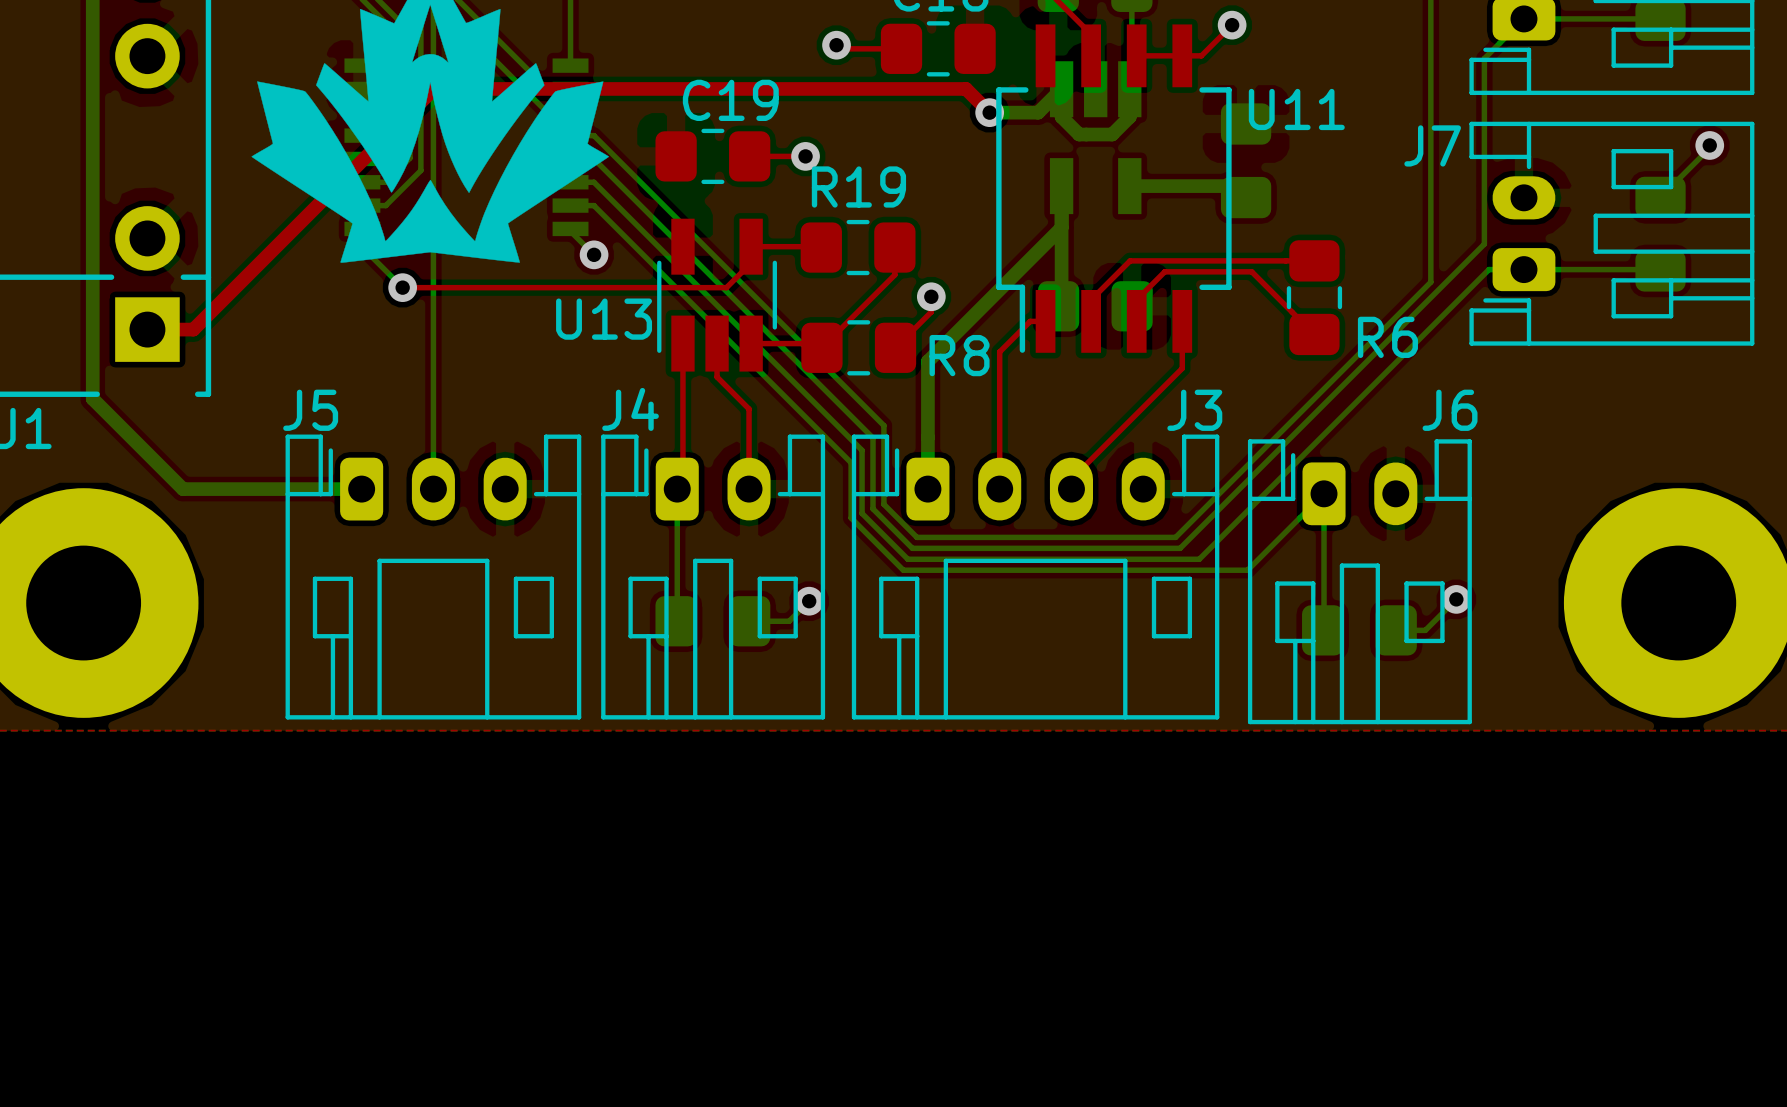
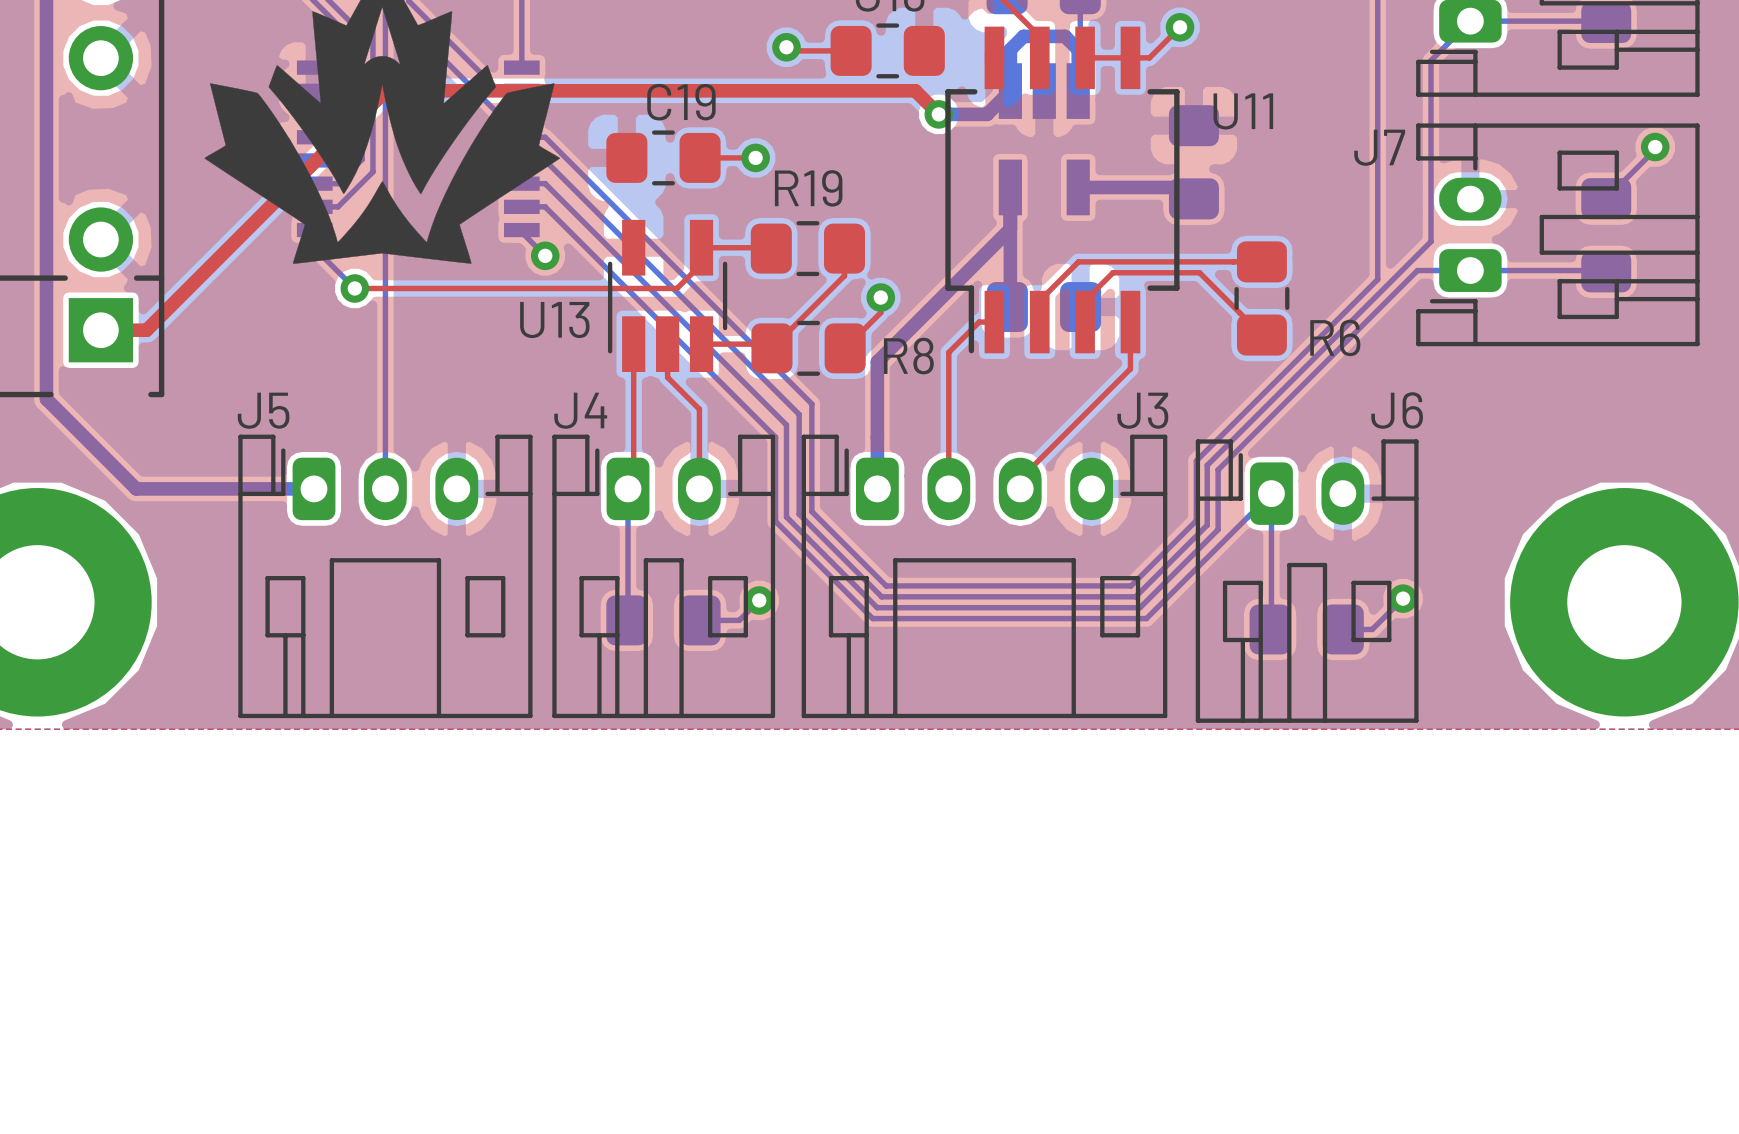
bottom track: (1061, 89) (1061, 116) (1079, 134) (1112, 134) (1129, 116) (1129, 89) -> (1010, 91) (1010, 49) (1023, 36) (1064, 36) (1078, 49) (1078, 91)
bottom track: (1484, 240) (1484, 244) (1180, 548) (912, 548) (872, 508) (872, 437) (849, 414) -> (1431, 241) (1207, 465) (1207, 525) (1135, 596) (881, 596) (799, 514) (799, 414)
bottom track: (1488, 269) (1199, 559) (907, 559) (862, 511) -> (1377, 279) (1196, 460) (1196, 520) (1131, 585) (886, 585) (811, 511)
bottom track: none -> (1435, 270) (1417, 270) (1218, 469) (1218, 529) (1140, 607) (877, 607) (786, 516) (786, 425)
bottom track: (1430, 278) (1430, 282) (1175, 537) (916, 537) (883, 504) (883, 425) (862, 403) -> none
bottom track: (836, 424) (862, 450) -> (811, 403) (811, 450)
bottom track: (825, 437) (851, 462) (851, 517) (903, 570) (1247, 570) -> (775, 437) (775, 521) (872, 618) (1146, 618) (1195, 569)

